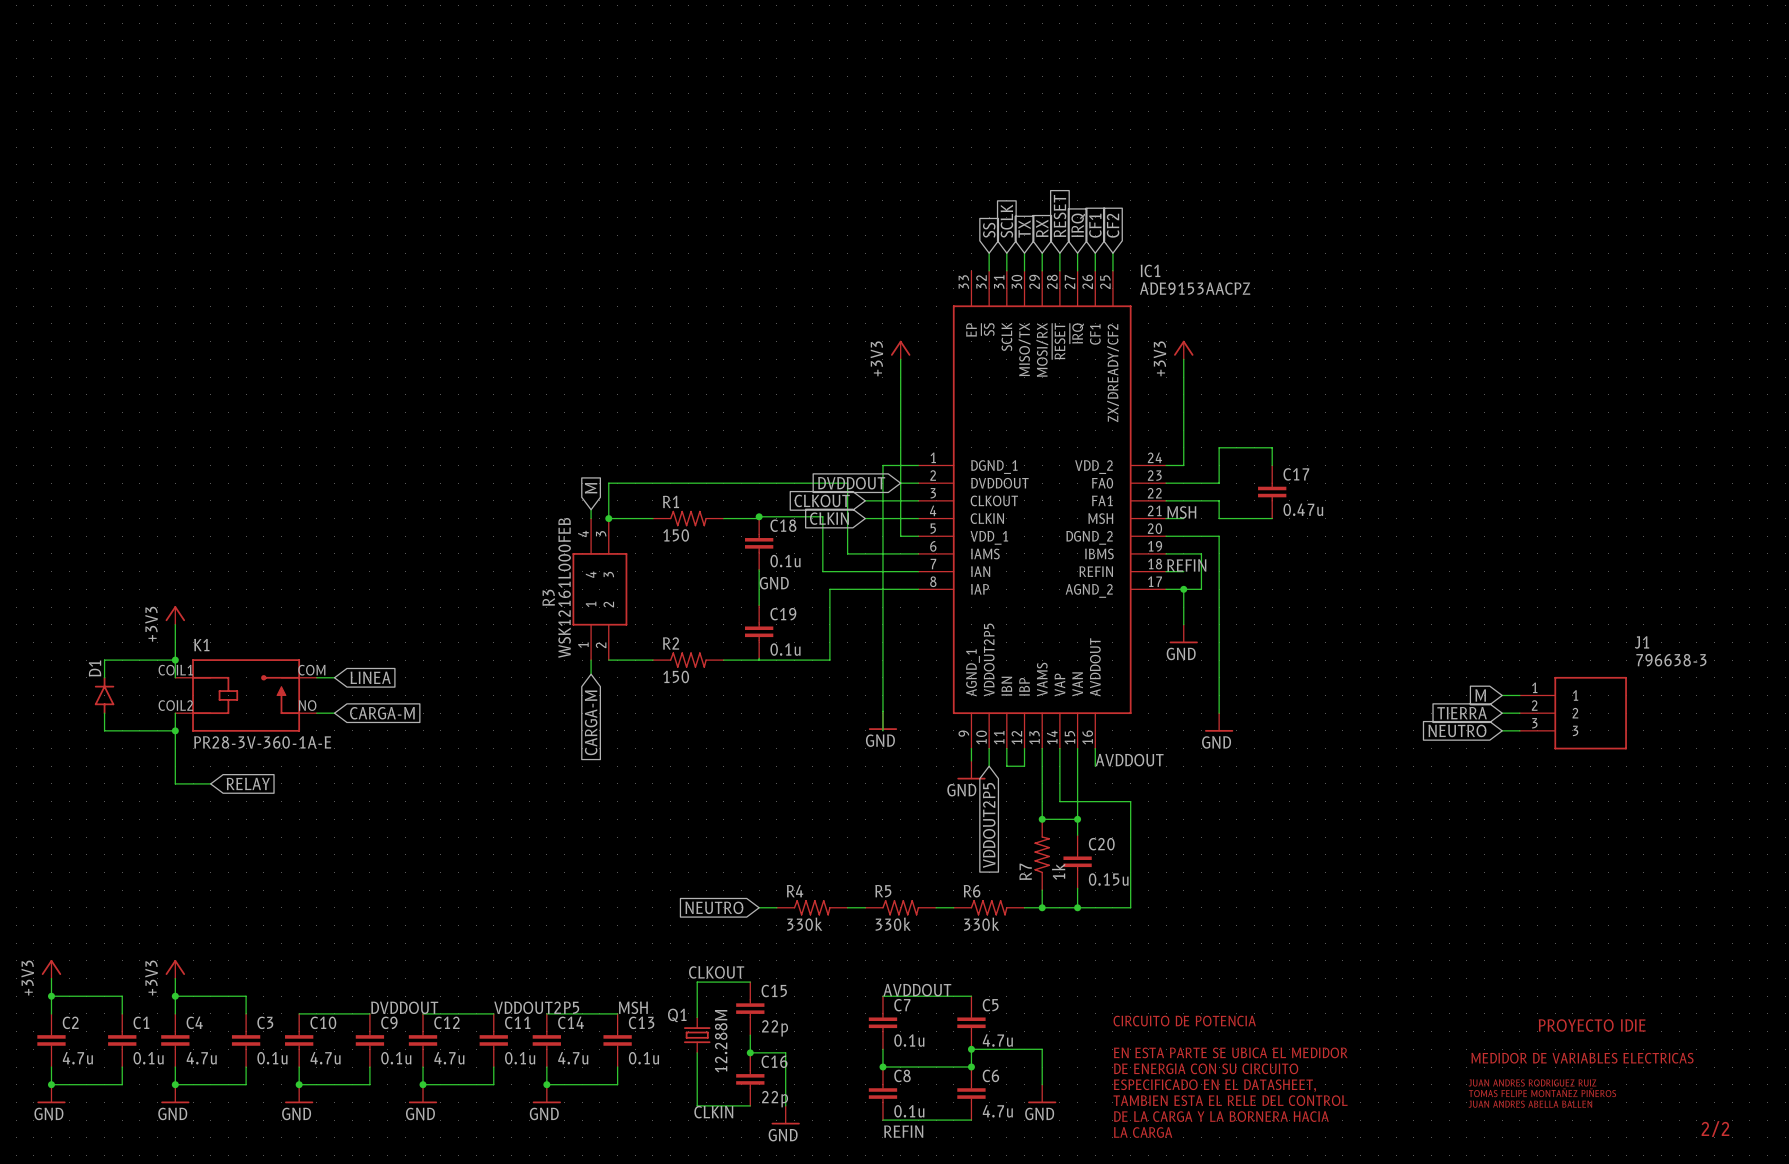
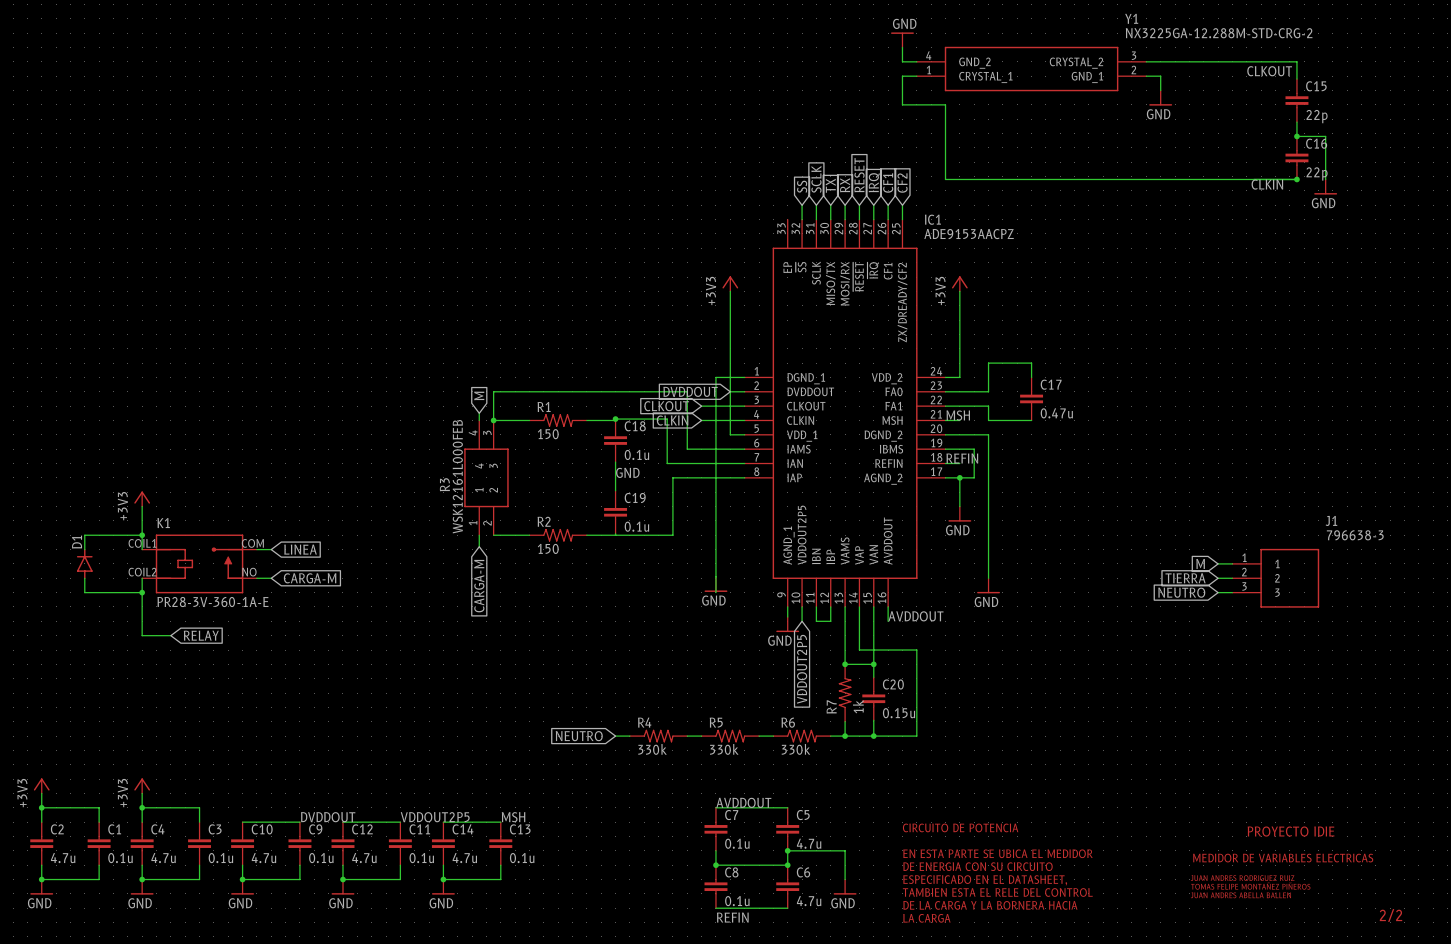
power symbol: none -> GND (902, 39)
wire: none -> (902, 47) (902, 61) (916, 61)
wire: none -> (1146, 61) (1296, 61) (1296, 79)
Y1: none -> NX3225GA-12.288M-STD-CRG-2 (1031, 69)
label: none -> CLKOUT (1269, 71)
wire: none -> (916, 76) (902, 76) (902, 104) (945, 104) (945, 179) (1296, 179)
wire: none -> (1146, 76) (1160, 76) (1160, 90)
power symbol: none -> GND (1160, 98)
wire: none -> (1296, 122) (1296, 136) (1325, 136) (1325, 179)
junction: none -> (1296, 136)
junction: none -> (1296, 179)
label: none -> CLKIN (1267, 184)
power symbol: none -> GND (1325, 187)
label: CLKOUT (716, 972) -> none
wire: (750, 982) (697, 982) (697, 1017) -> none
C15 position: (750, 1008) -> (1296, 100)
Q1: 12.288M (697, 1035) -> none
wire: (750, 1035) (750, 1052) (785, 1052) (785, 1105) -> none
wire: (697, 1052) (697, 1105) (750, 1105) -> none
junction: (750, 1052) -> none
C16 position: (750, 1079) -> (1296, 157)
label: CLKIN (713, 1112) -> none
power symbol: GND (785, 1115) -> none

